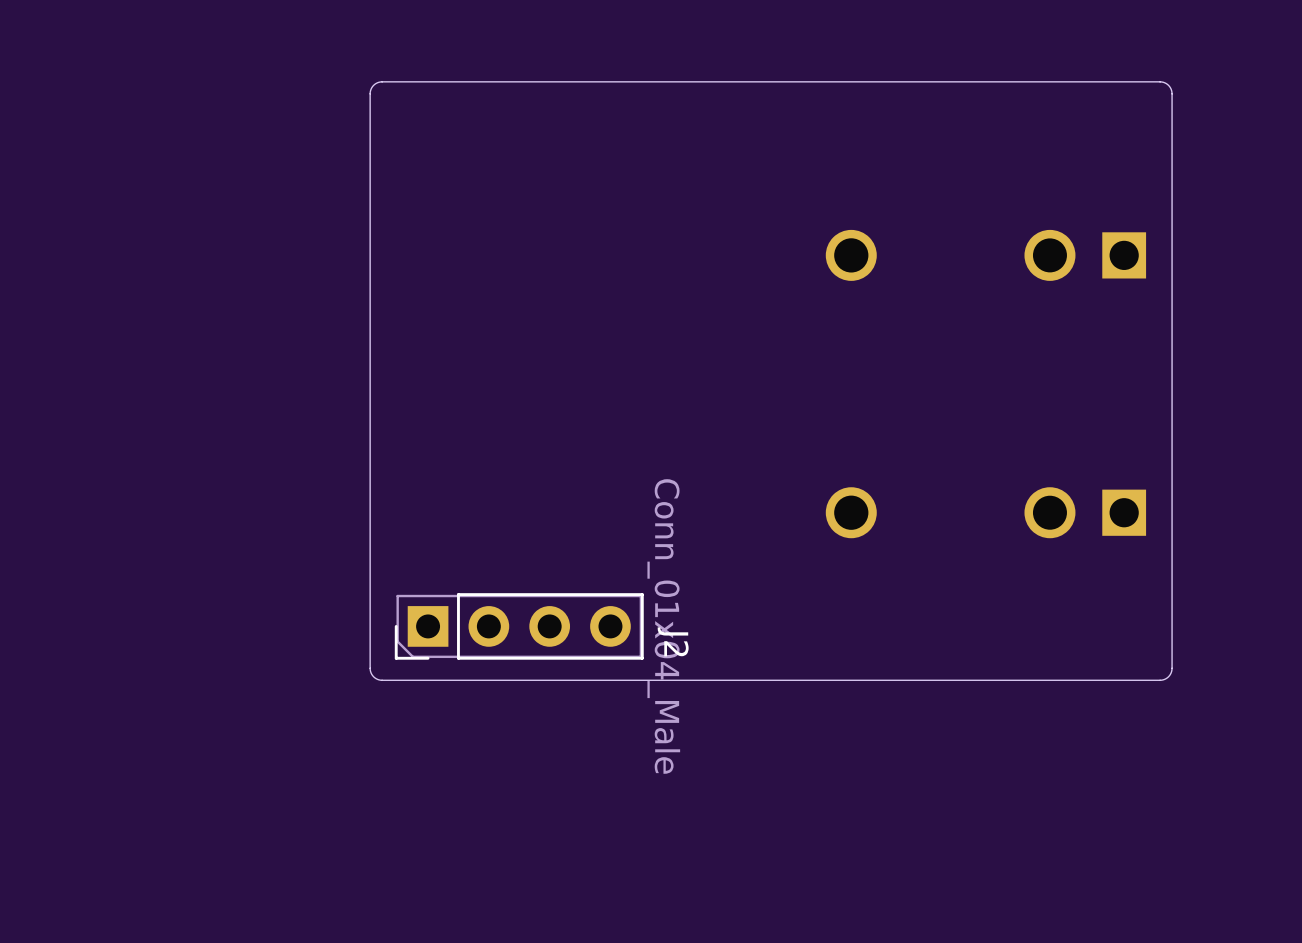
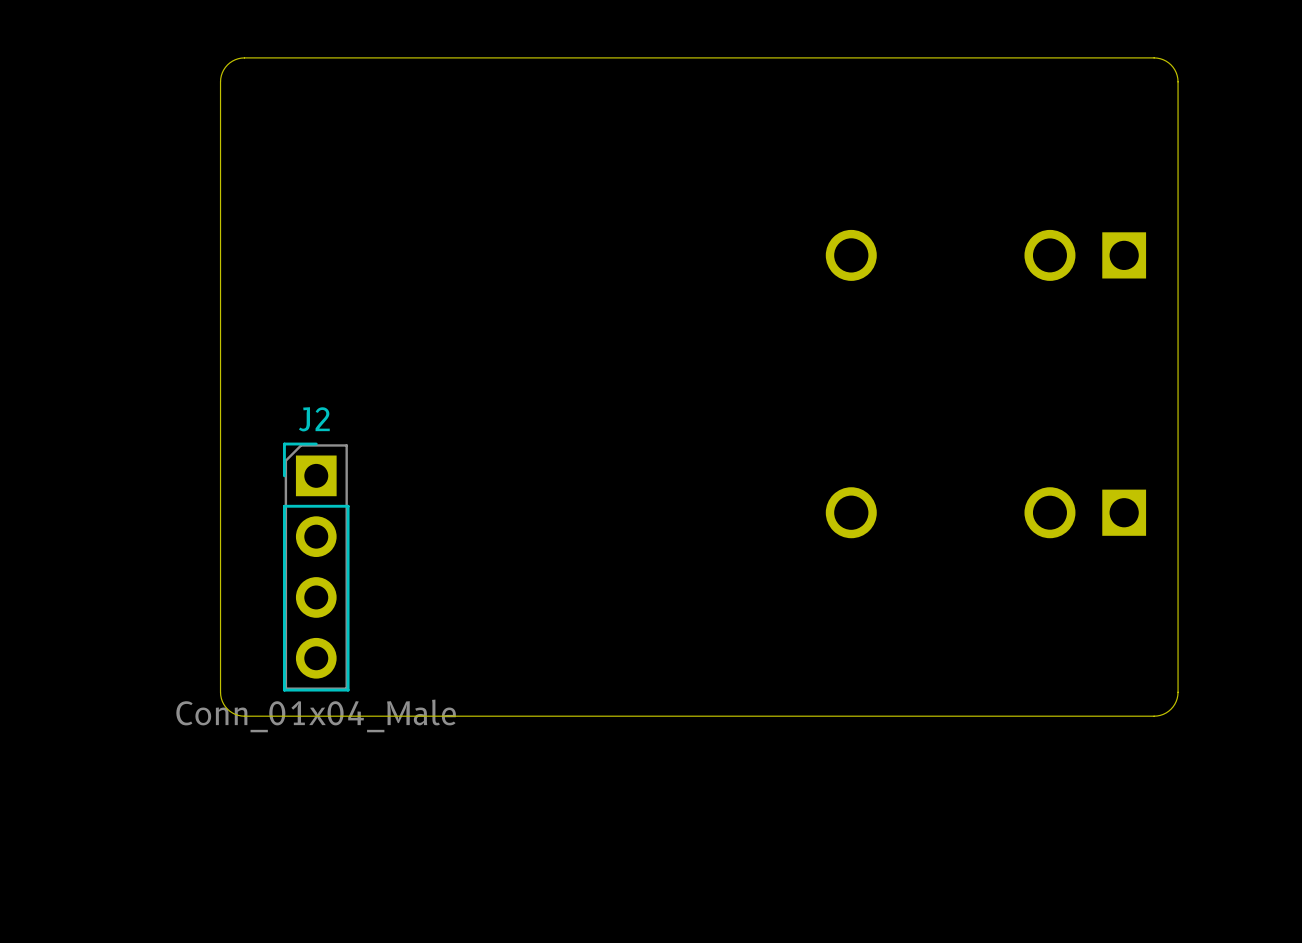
board edge: (1160, 81) (382, 81) (374, 84) (370, 93) (370, 668) (372, 675) (382, 680) (1160, 680) (1167, 677) (1172, 668) (1172, 93) (1168, 85) (1160, 81) -> (1154, 57) (1163, 59) (1171, 64) (1176, 72) (1178, 81) (1178, 692) (1176, 701) (1168, 711) (1154, 716) (244, 716) (235, 714) (225, 706) (220, 692) (220, 81) (222, 72) (229, 62) (244, 57) (1154, 57)
J2 rotation: 0° (519, 626) -> 90° clockwise (316, 567)
J2 position: (519, 626) -> (316, 567)
J2 name position: J2 (673, 641) -> J2 (314, 419)

